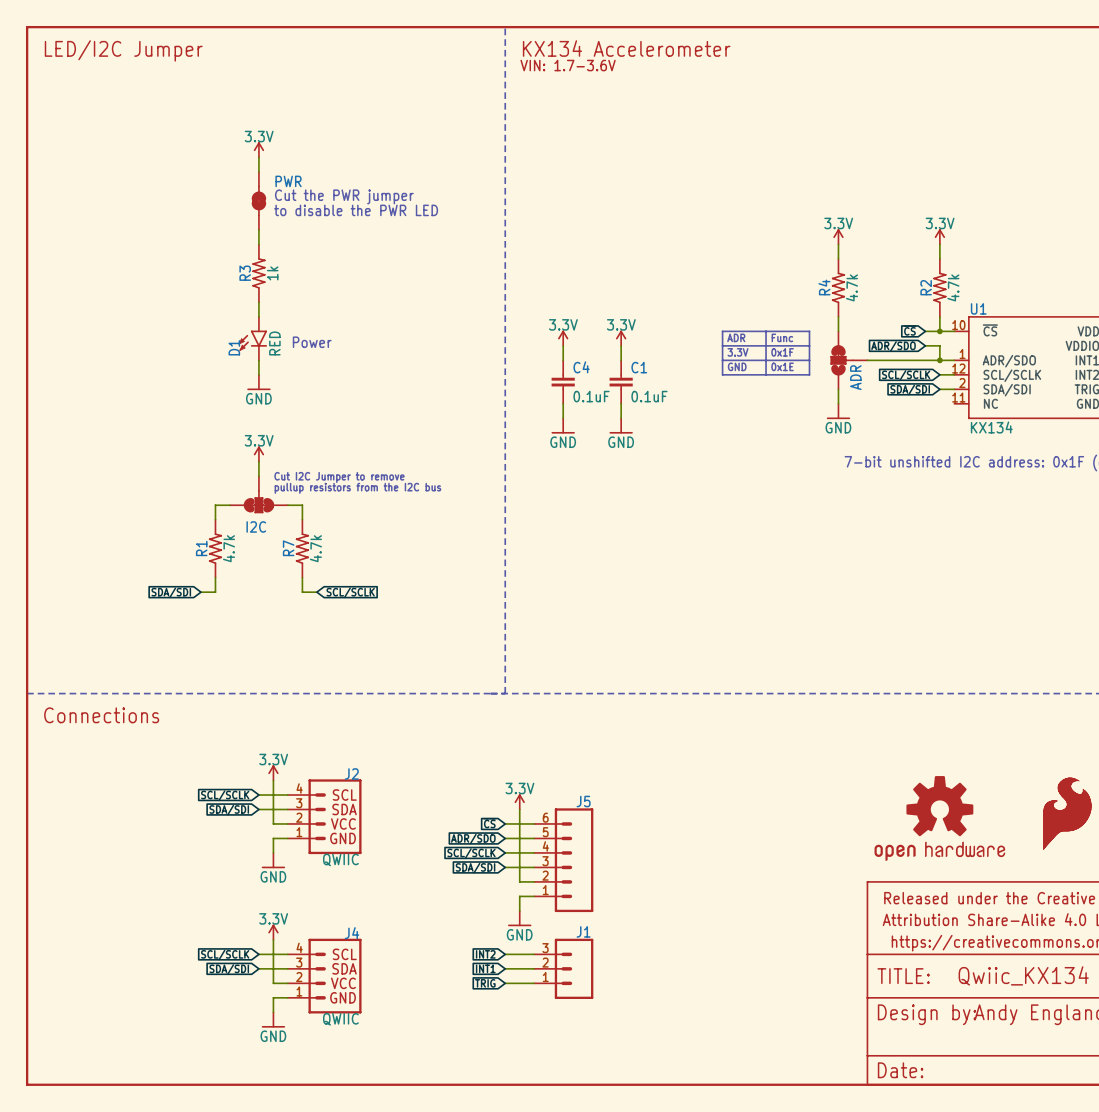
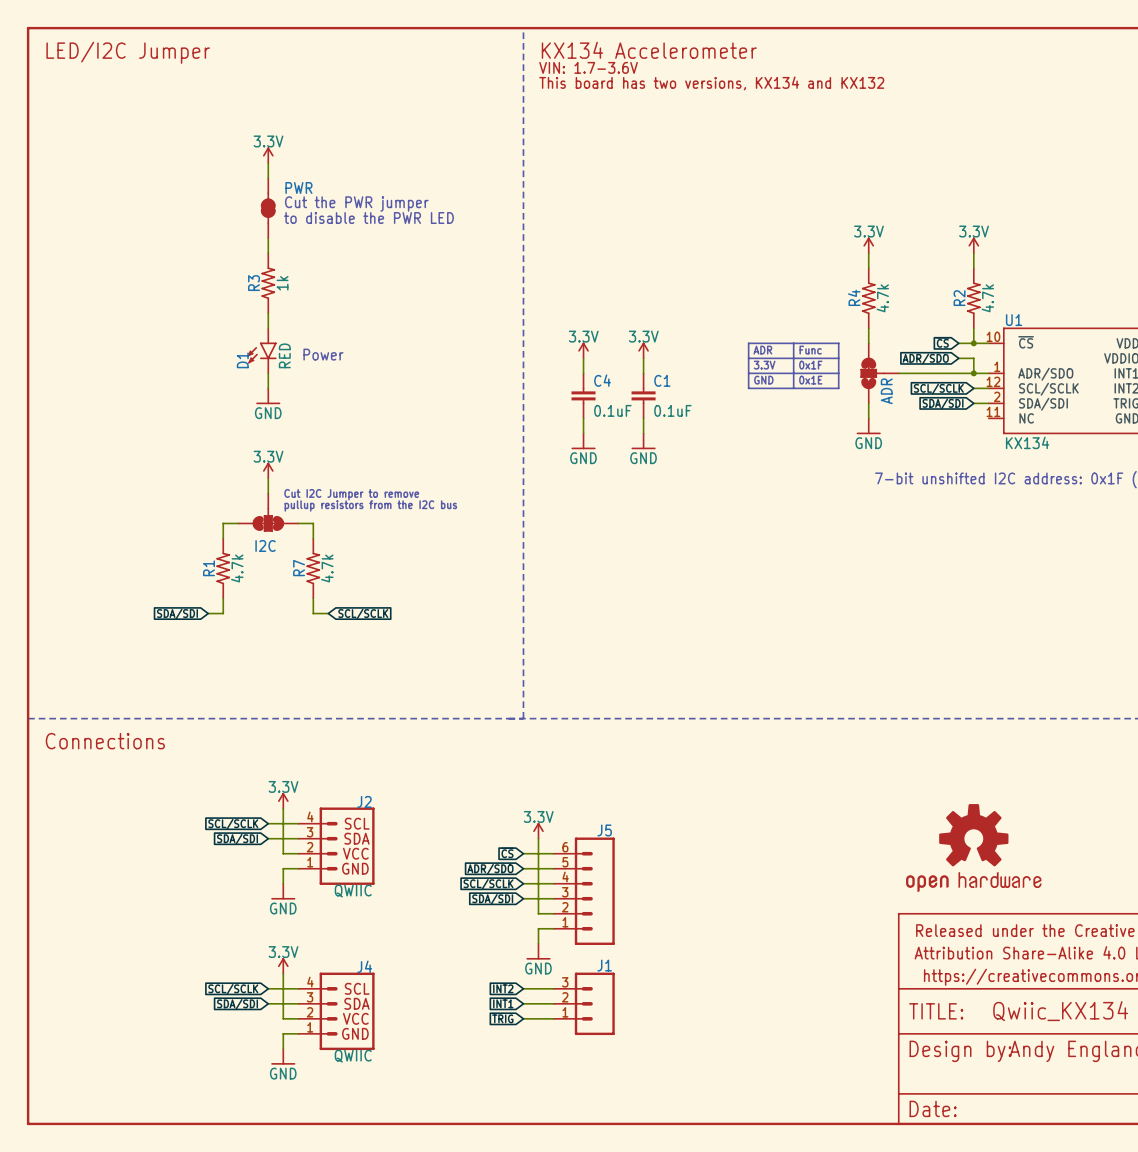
text: none -> This board has two versions, KX134 and KX132 (711, 83)
part: (1067, 813) -> none

